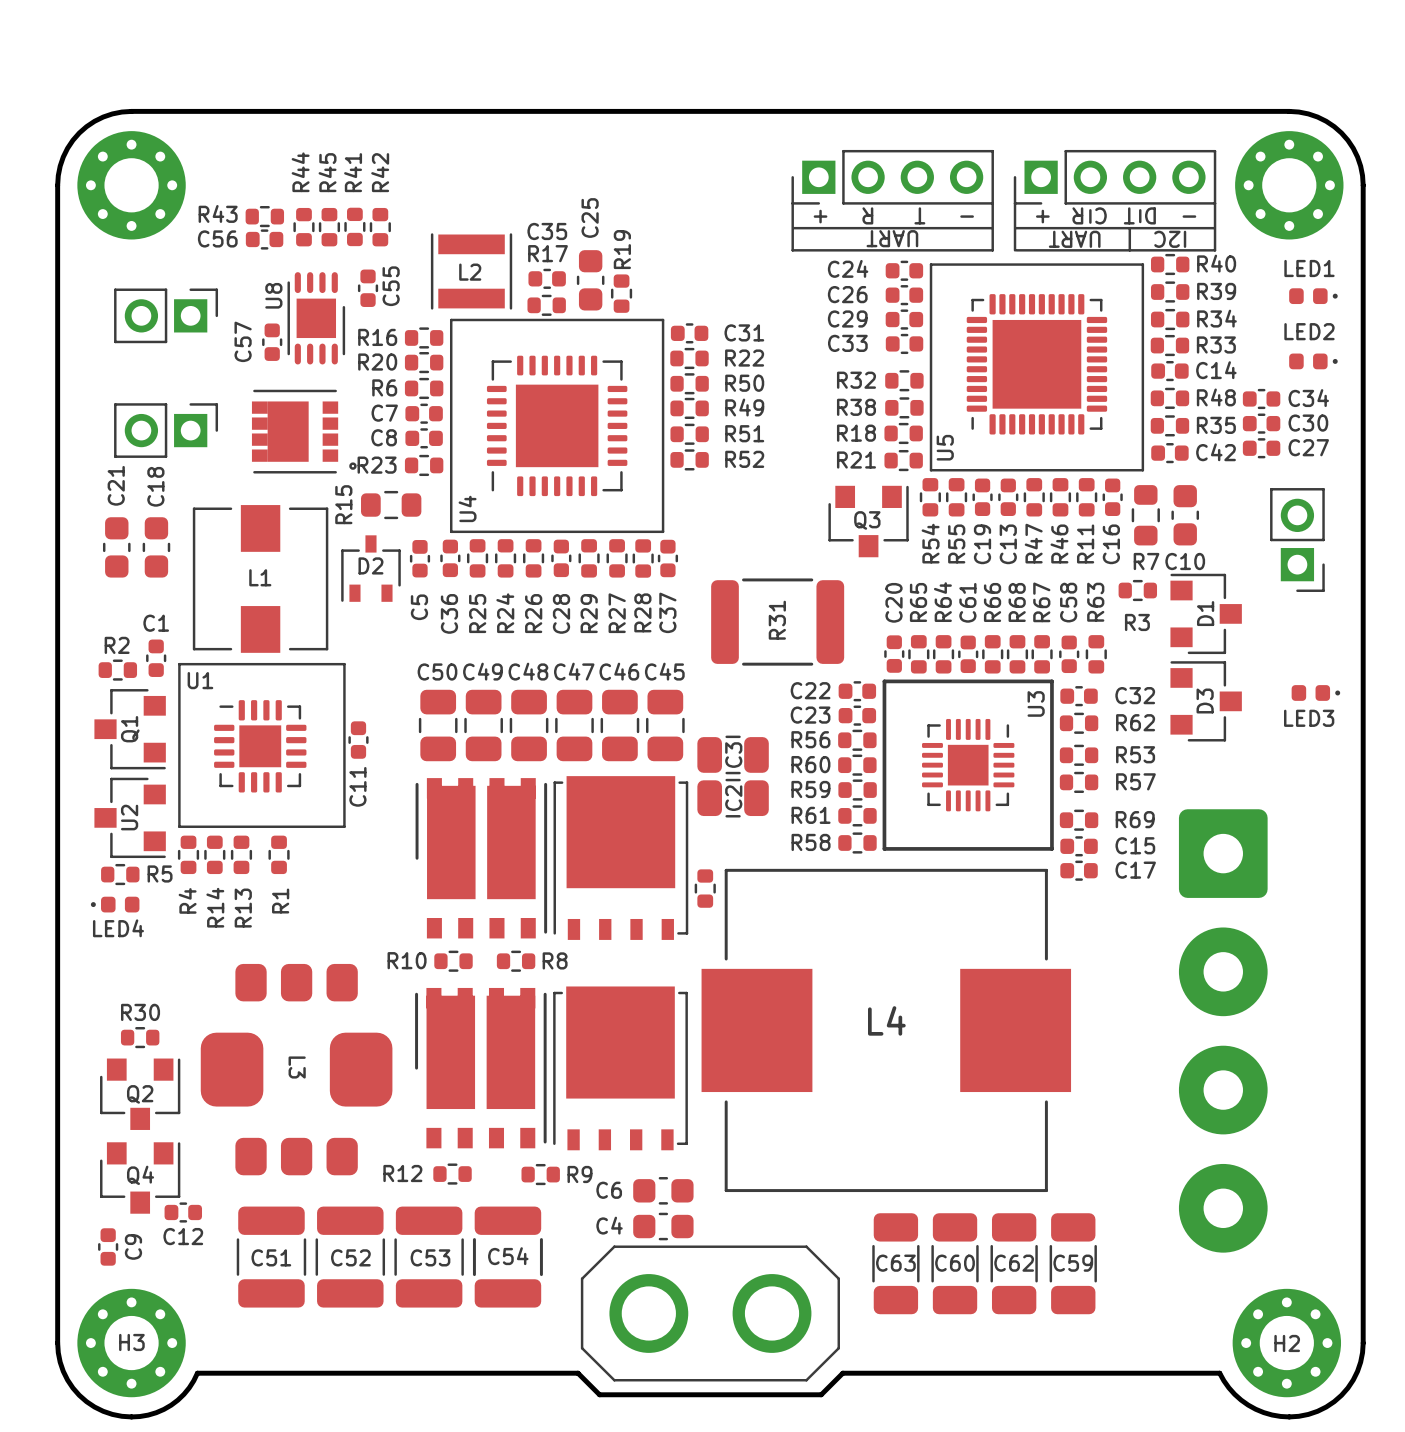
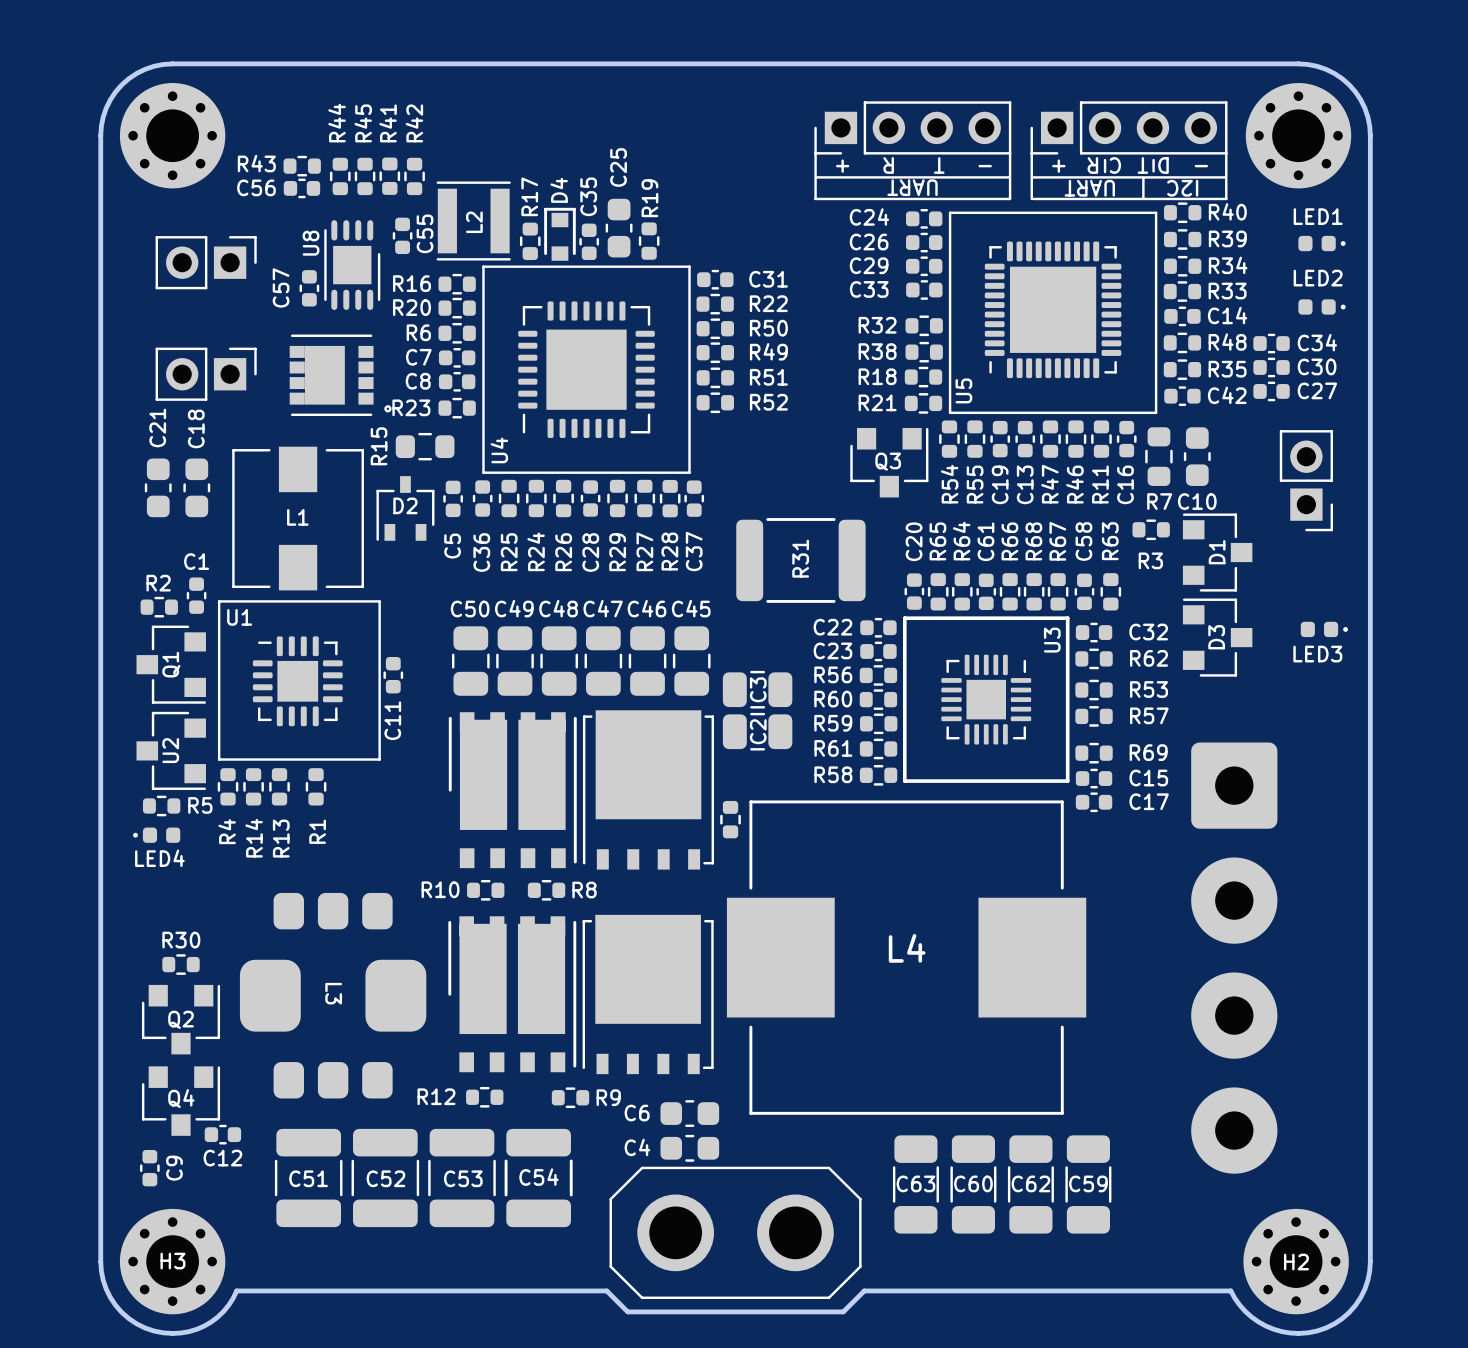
L2 rotation: 0° (471, 271) -> 90° clockwise (473, 221)
C35 rotation: 0° (547, 278) -> 90° clockwise (589, 241)
D4: none -> (559, 234)
R17 rotation: 0° (546, 305) -> 90° clockwise (530, 241)
R17 position: (546, 305) -> (530, 241)

